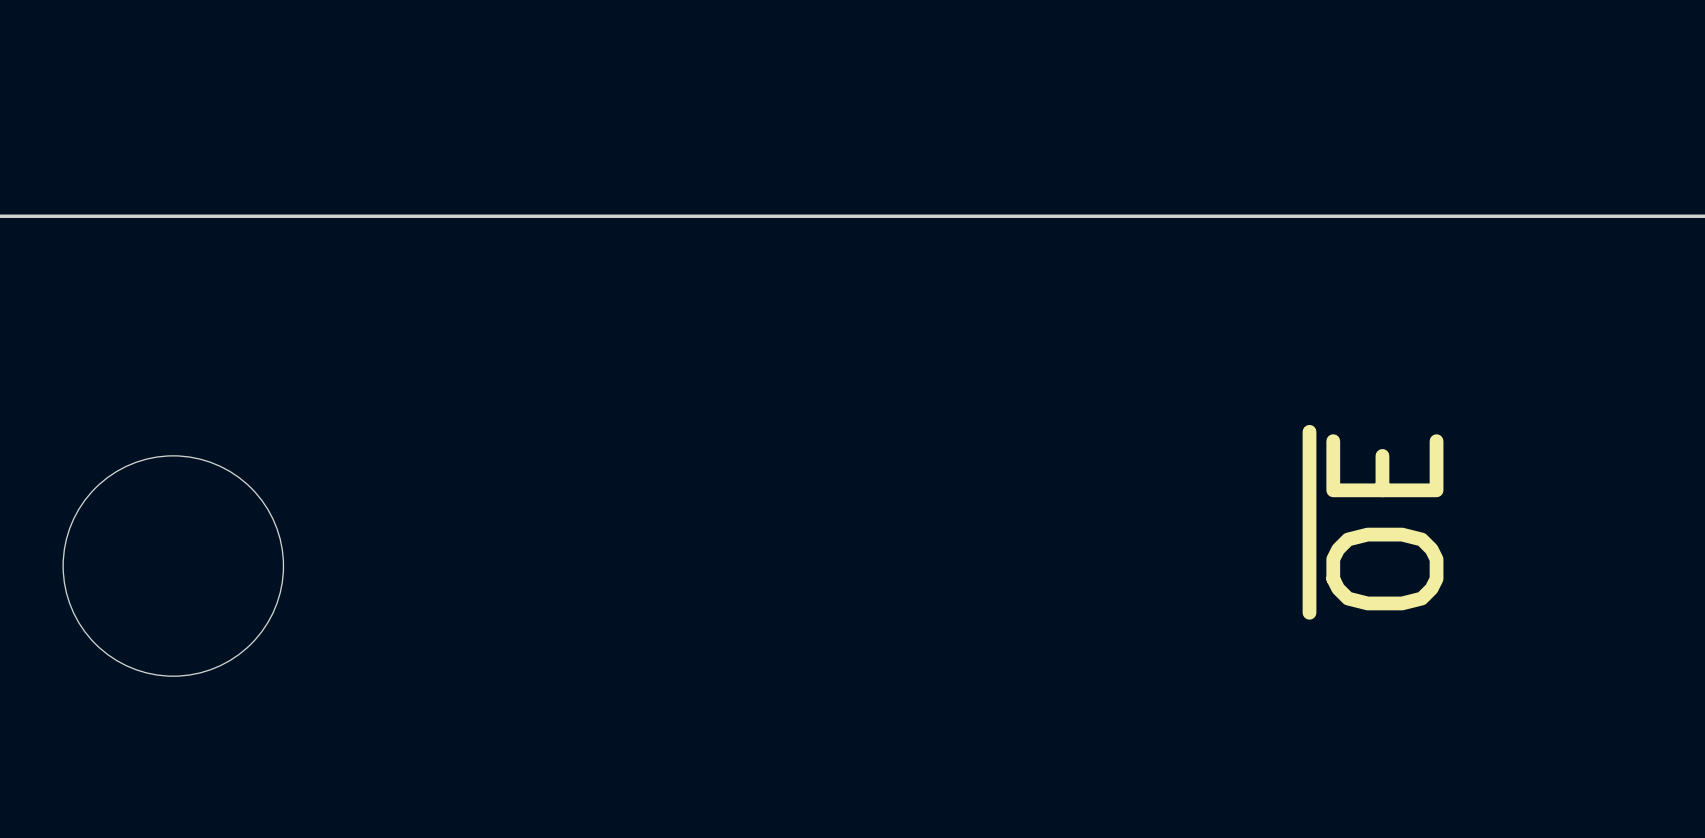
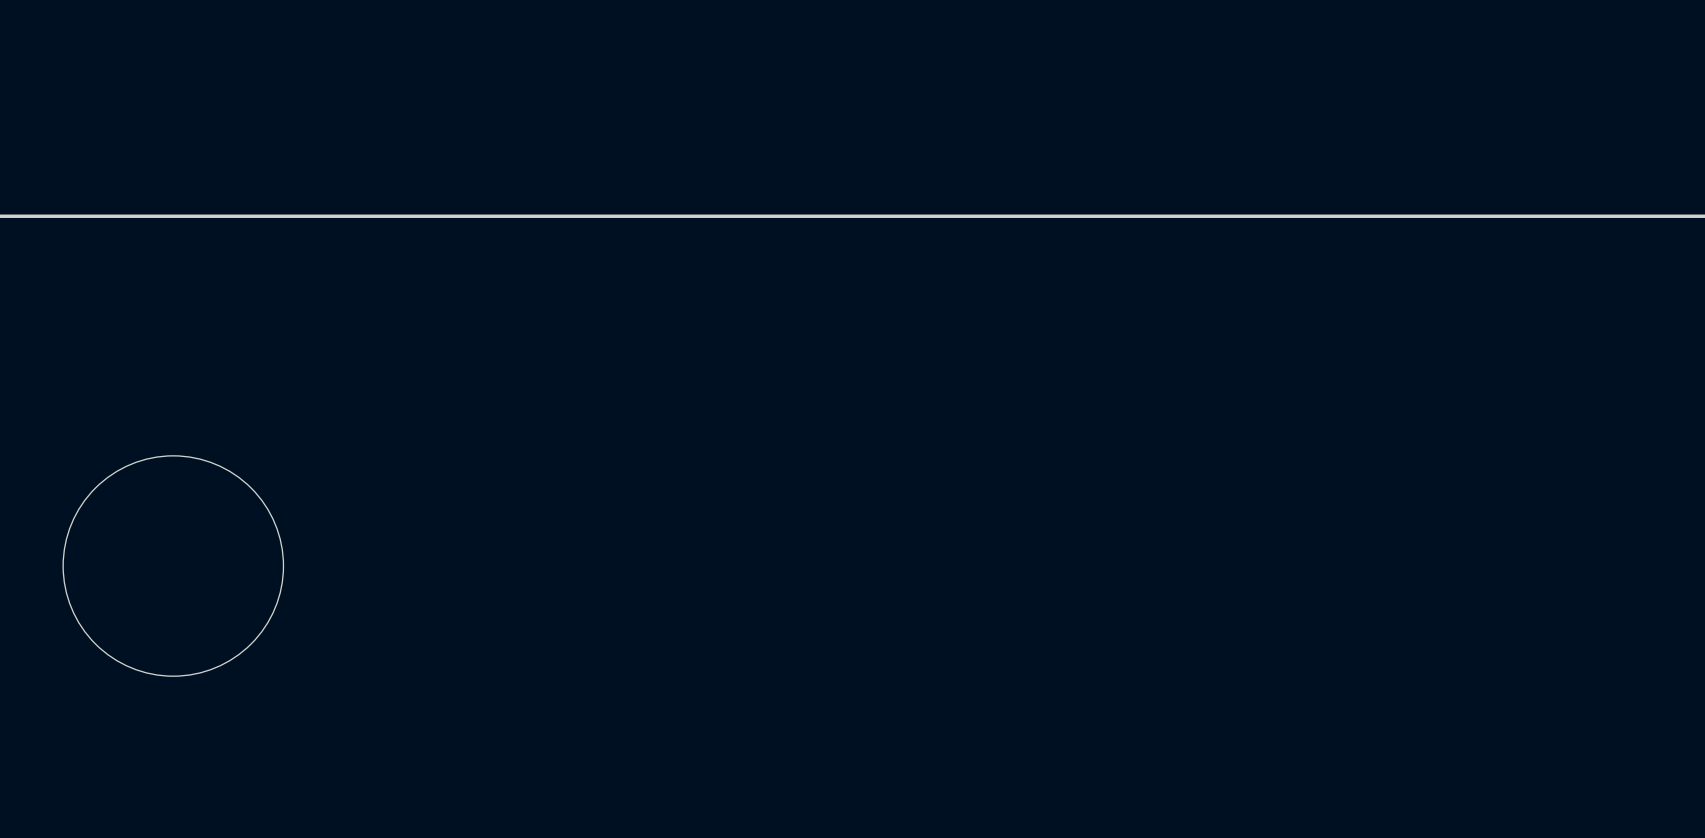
text: ~{OE} (1373, 522) -> none

